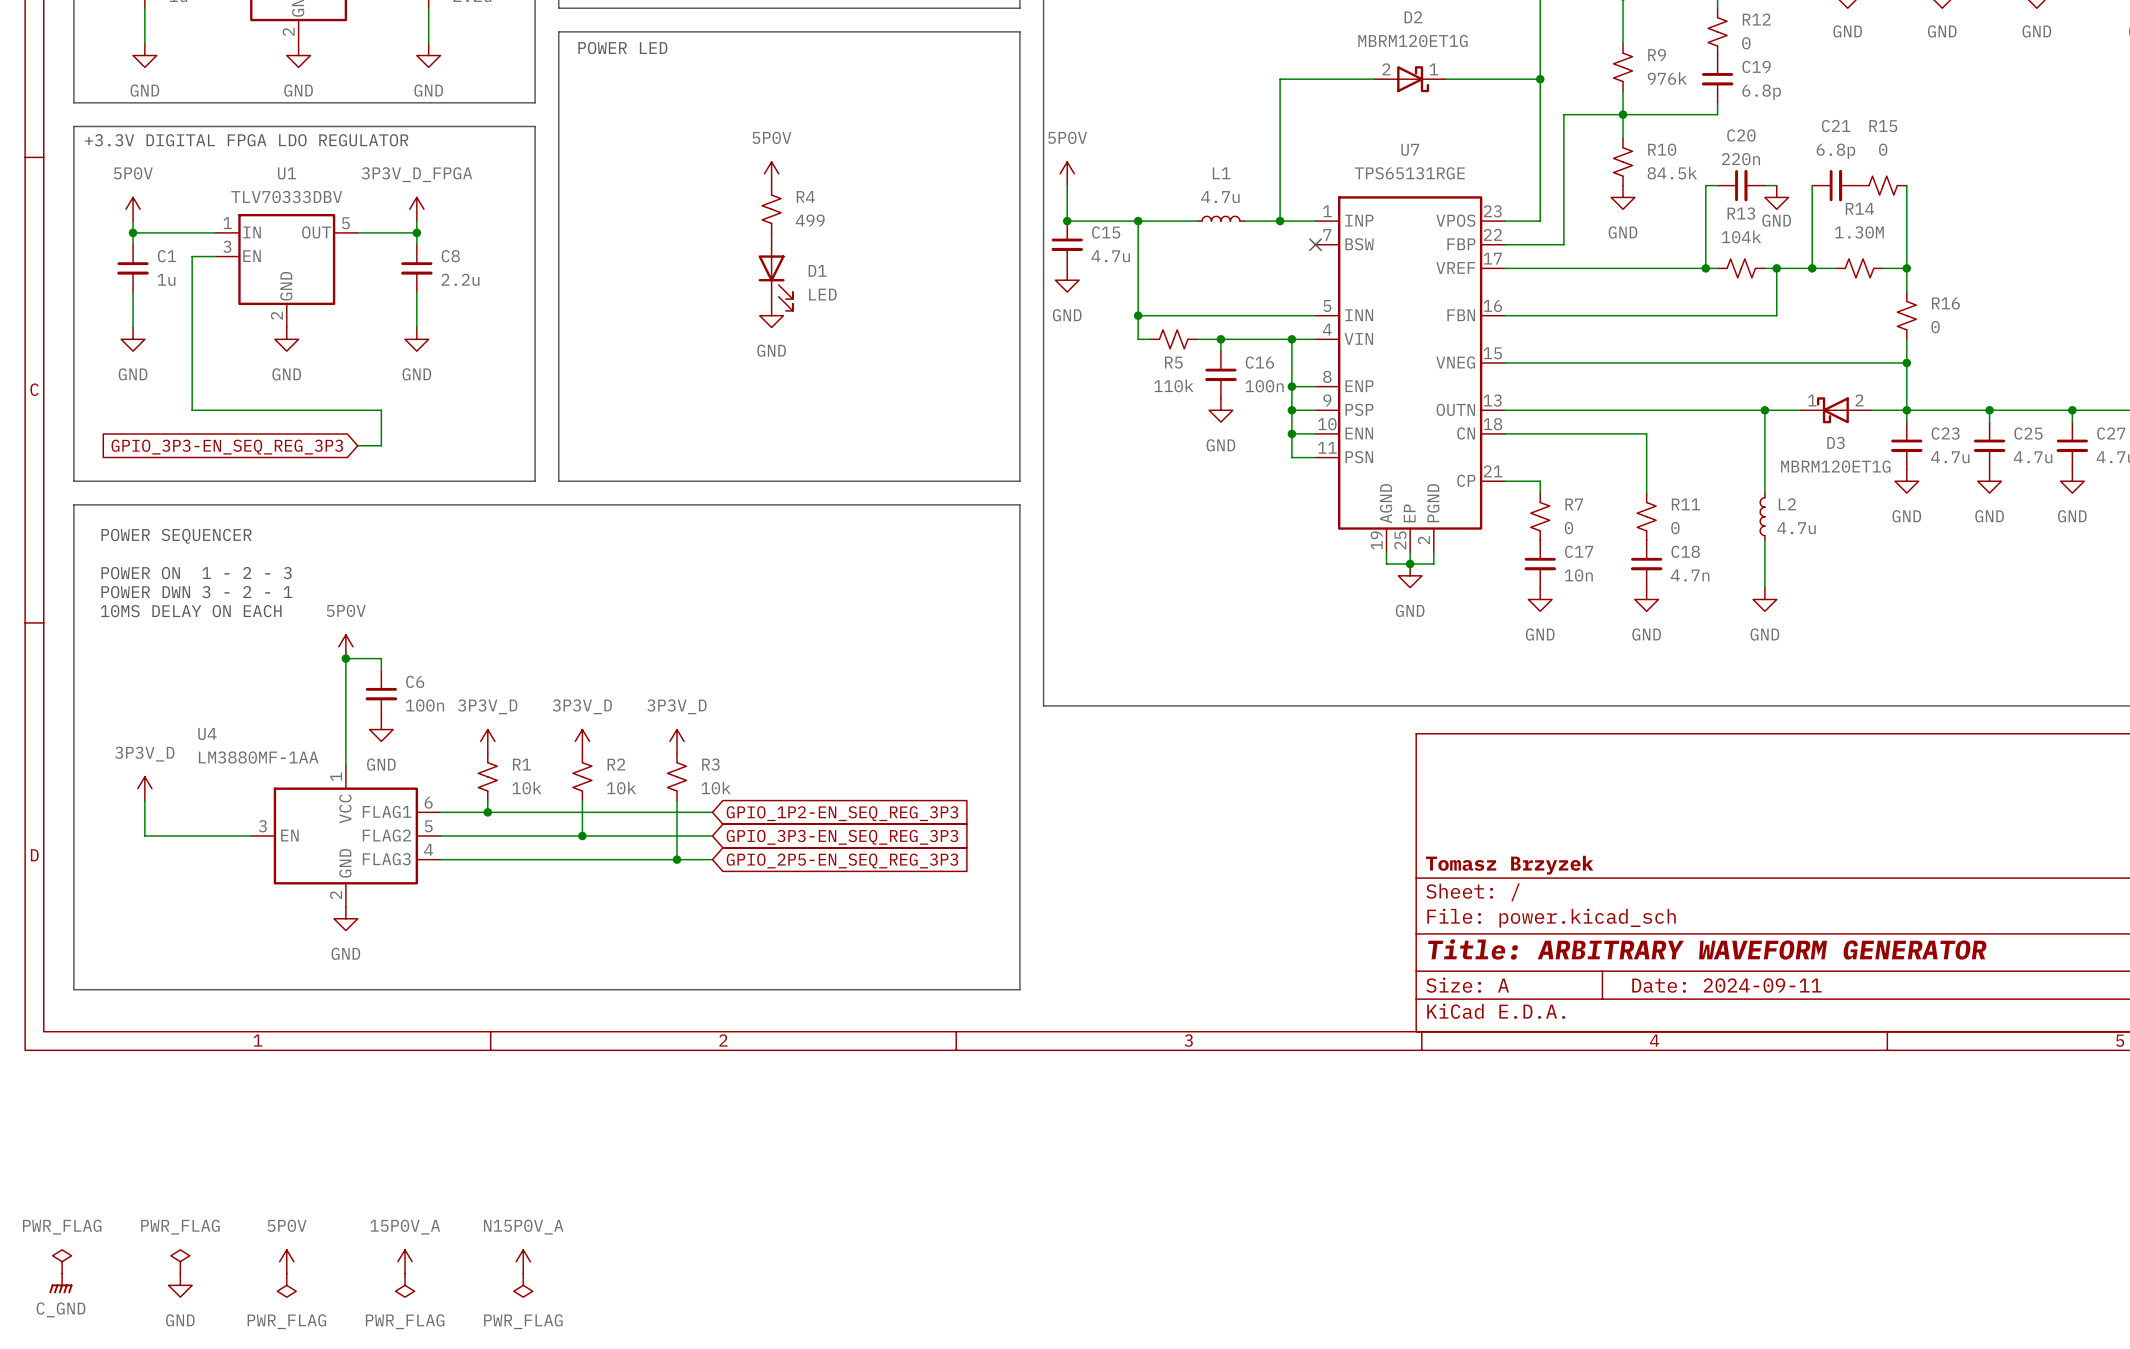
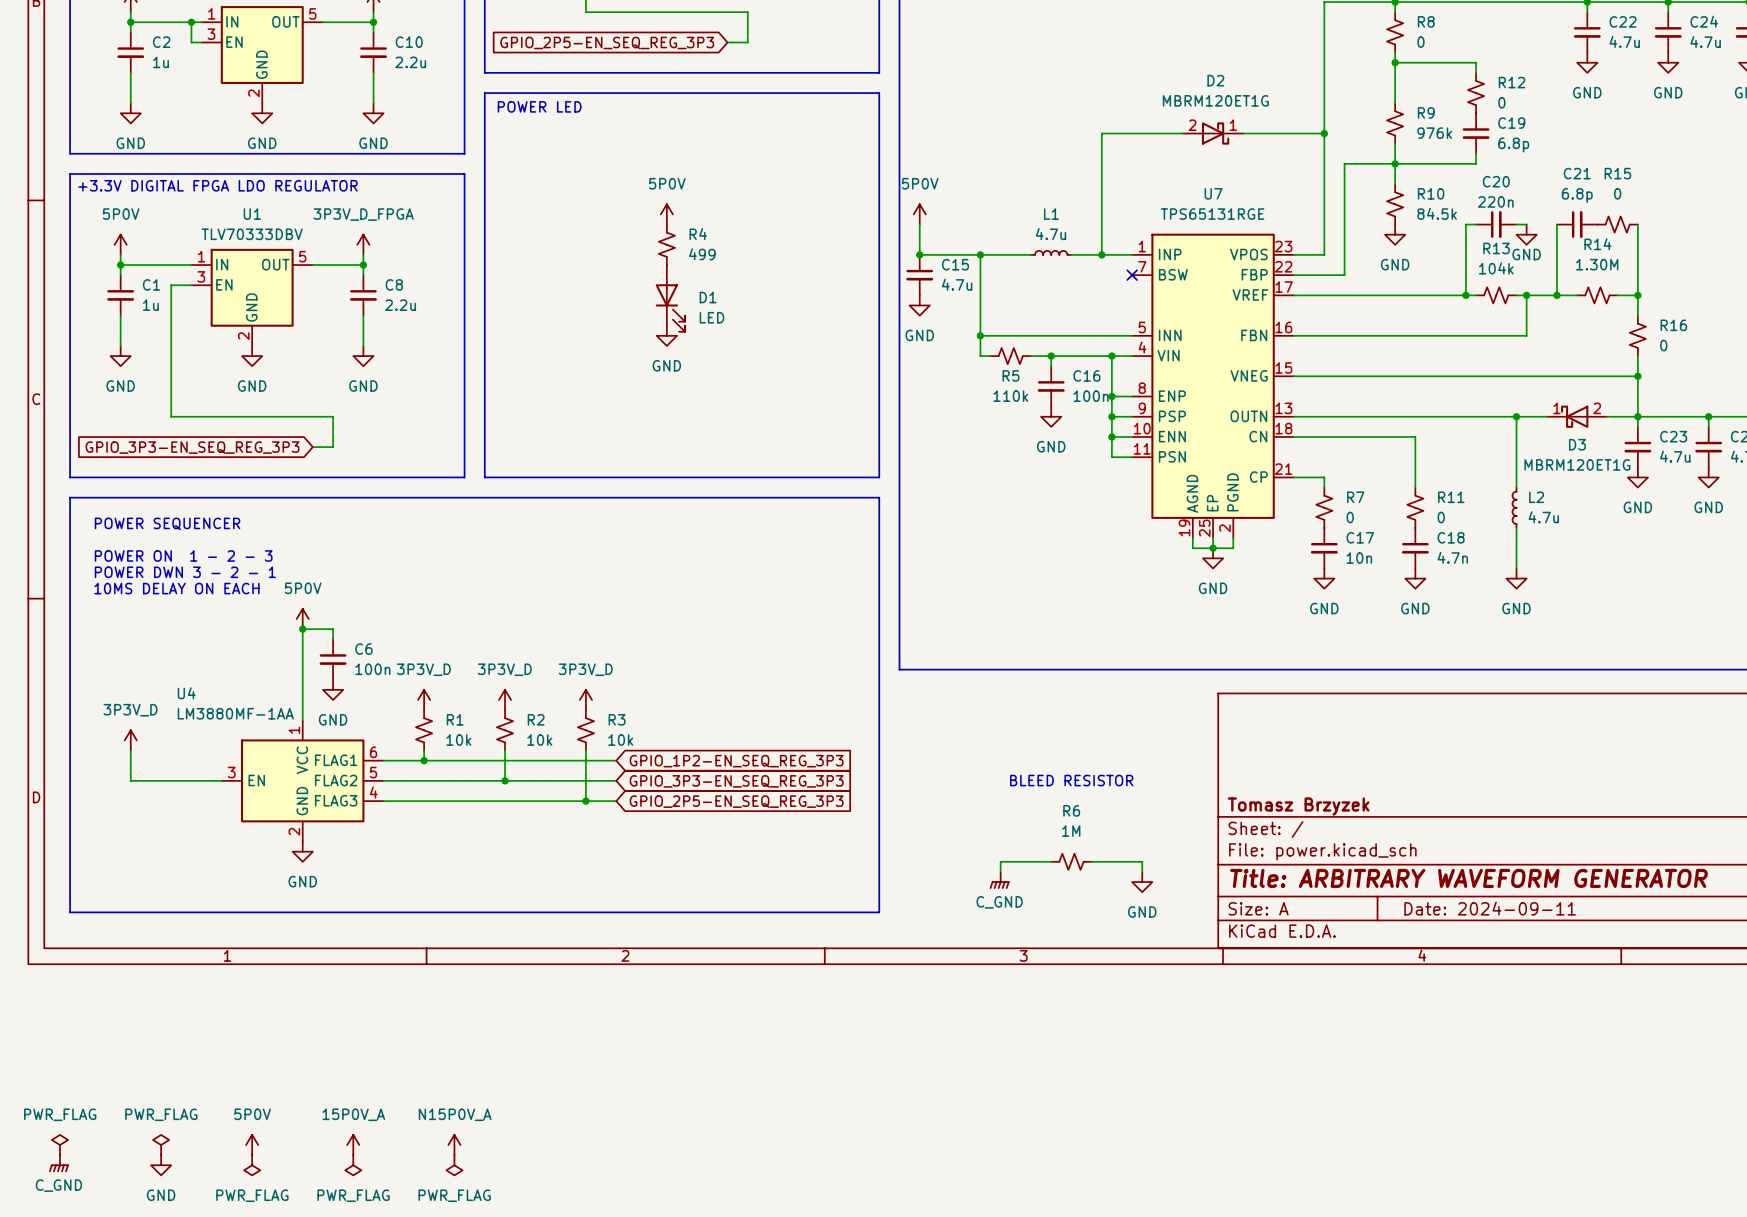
text: none -> BLEED RESISTOR (1071, 780)
wire: none -> (1051, 861) (1000, 861) (1000, 871)
R6: none -> 1M (1071, 861)
wire: none -> (1091, 861) (1142, 861) (1142, 871)
power symbol: none -> C_GND (999, 880)
power symbol: none -> GND (1142, 882)

